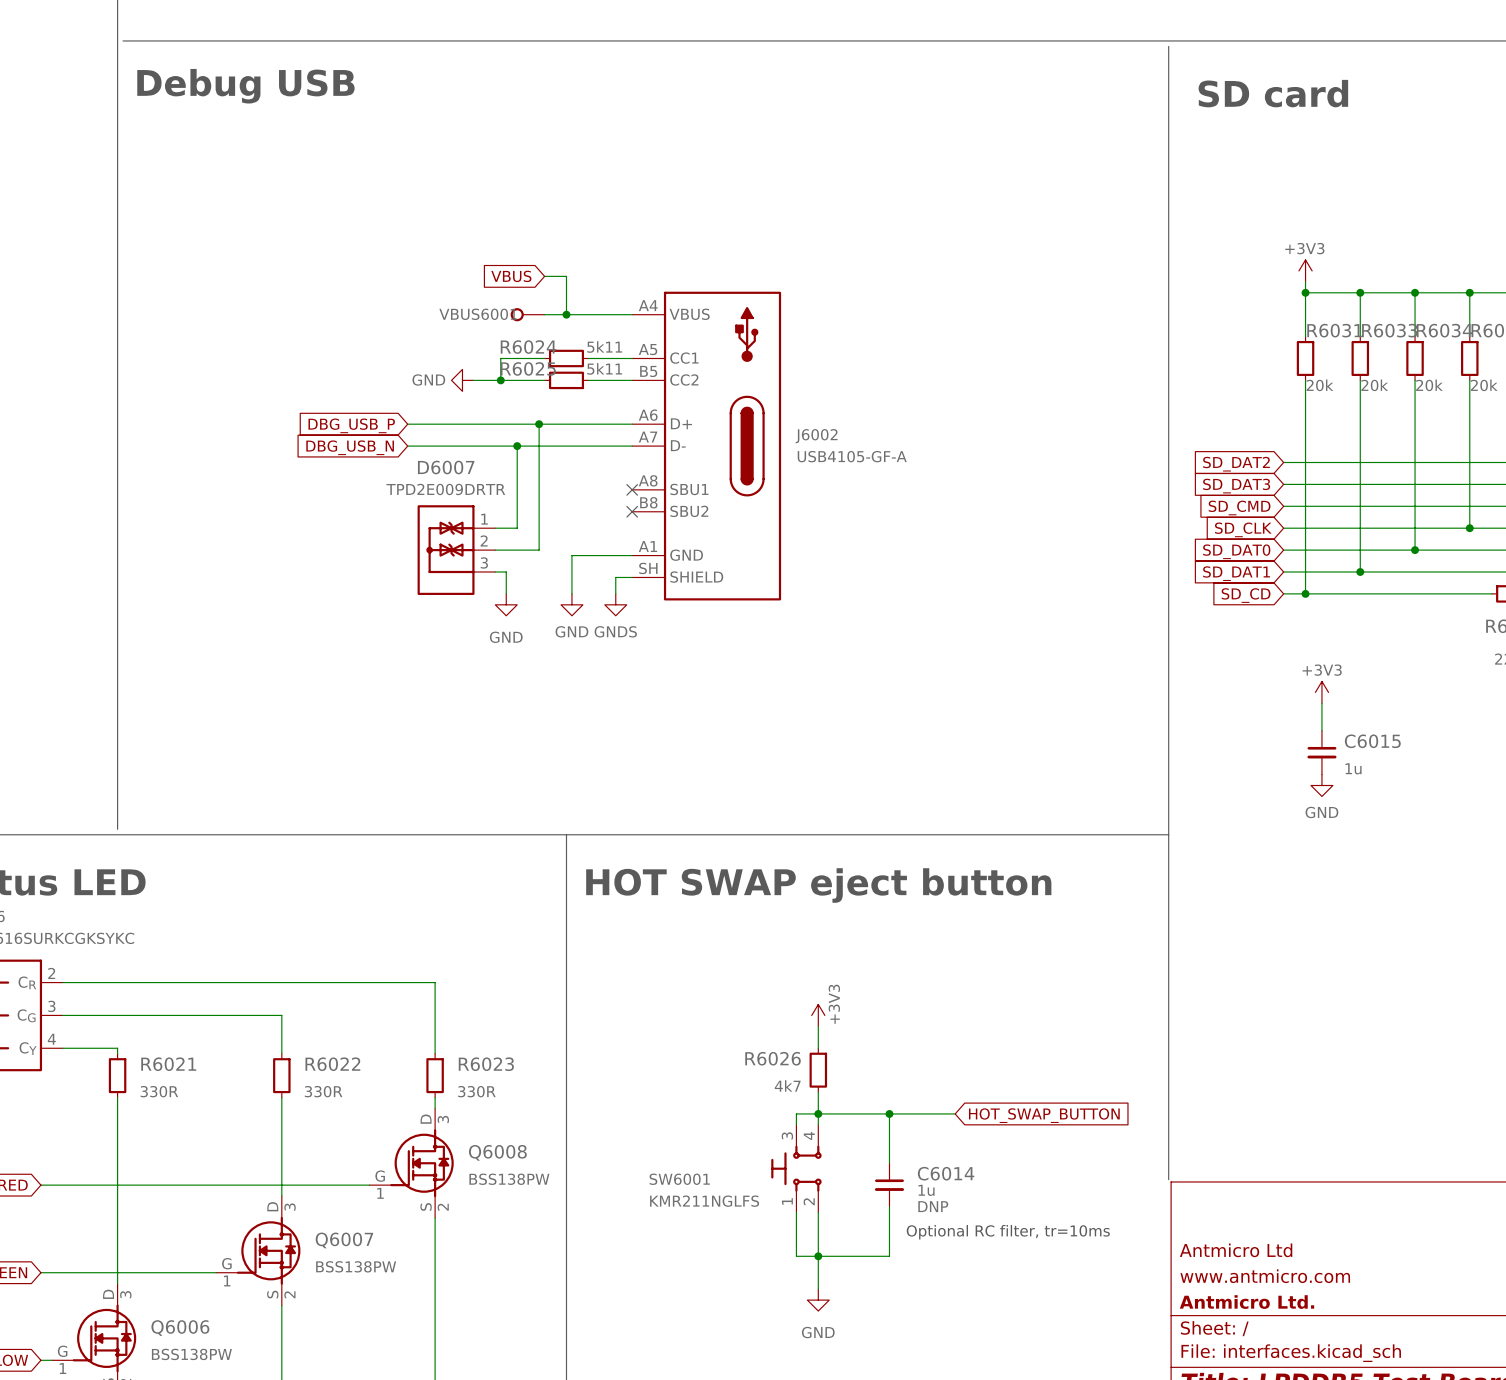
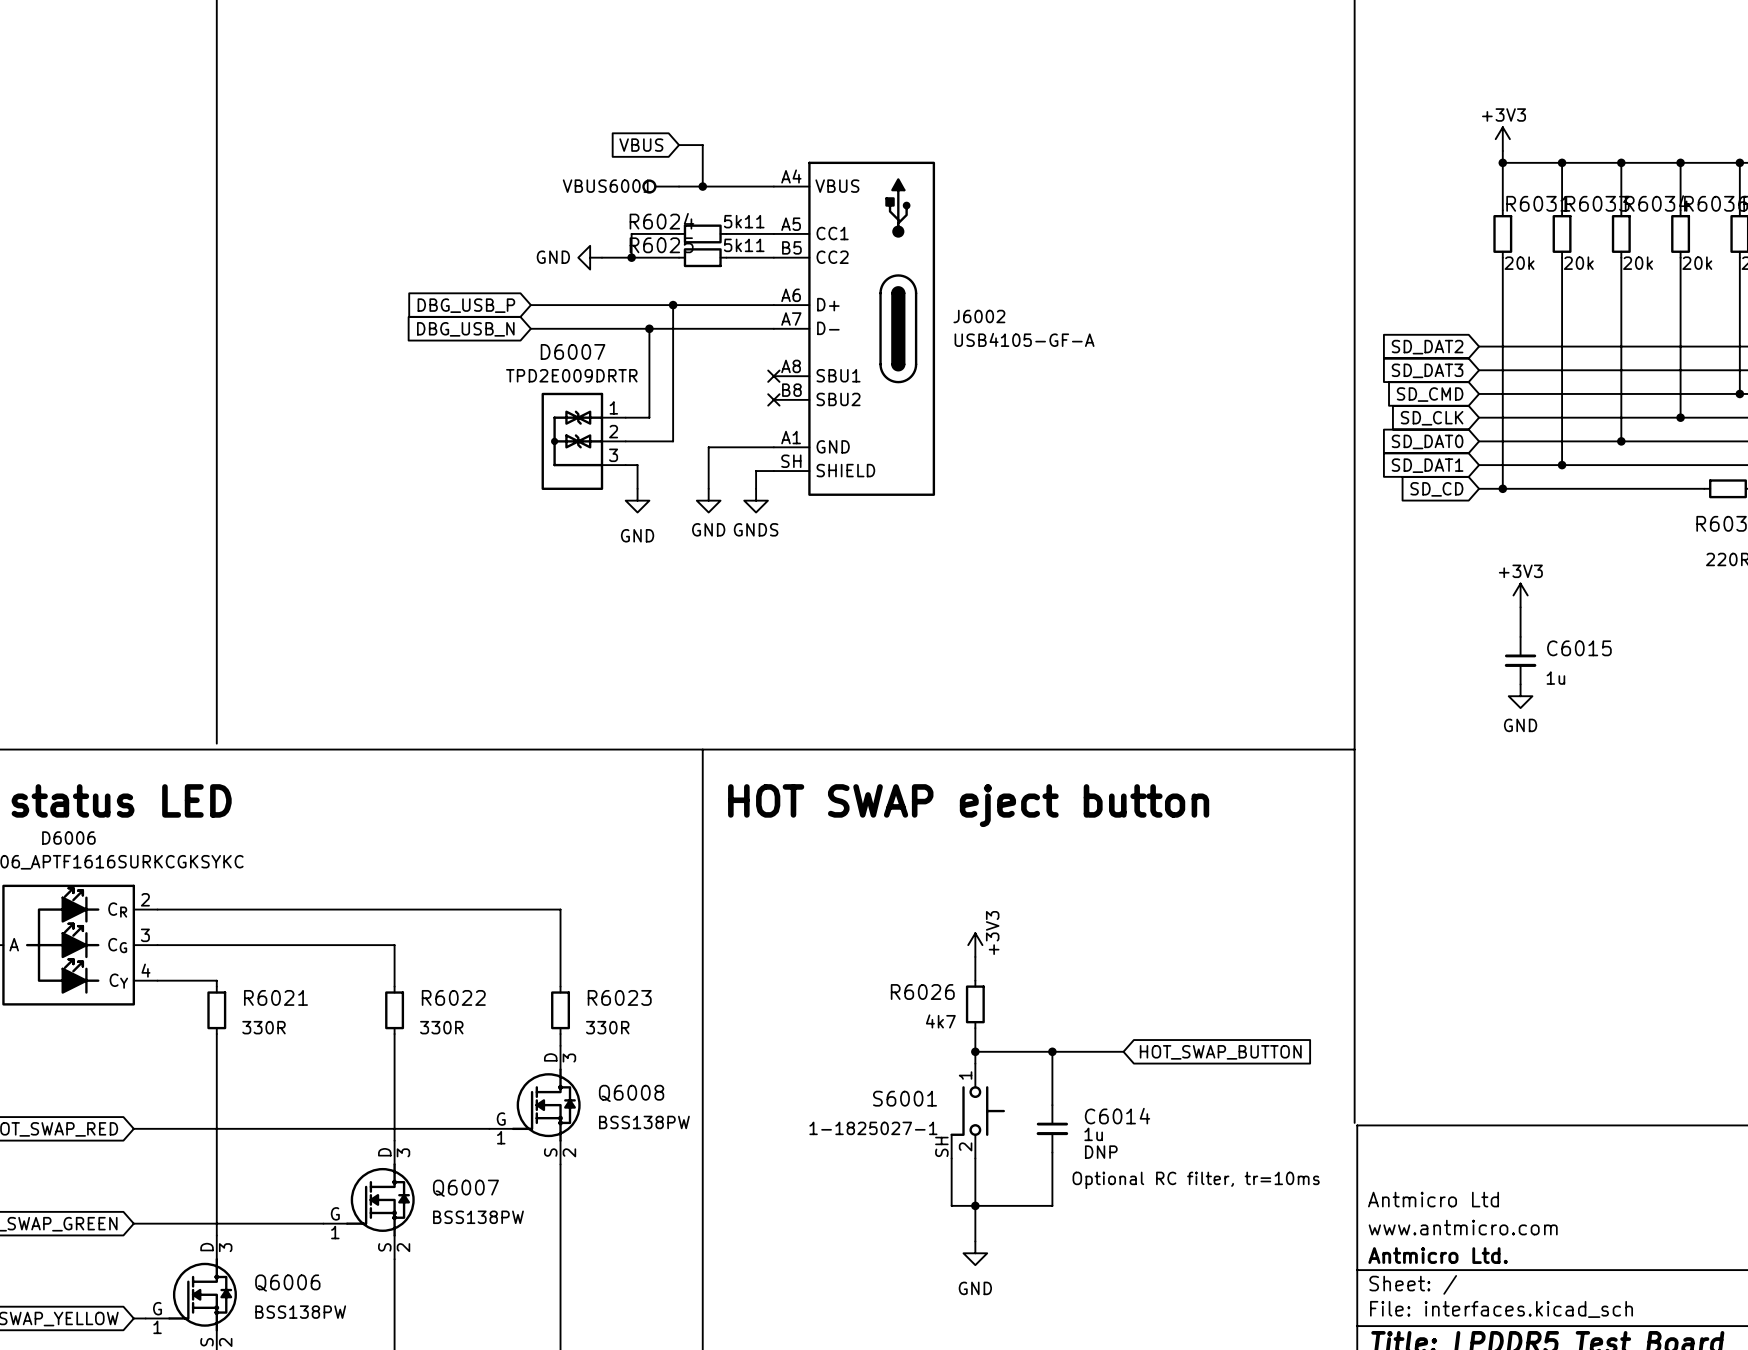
wire: (818, 1113) (796, 1113) (796, 1124) -> none
SW6001: (796, 1168) -> none
S6001: none -> (977, 1111)

